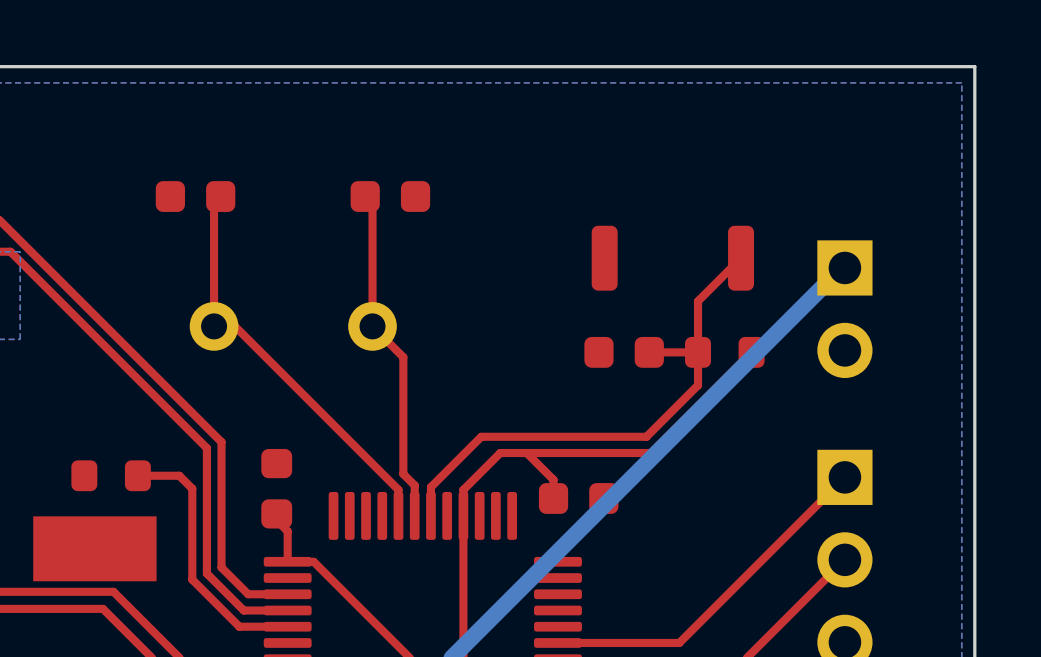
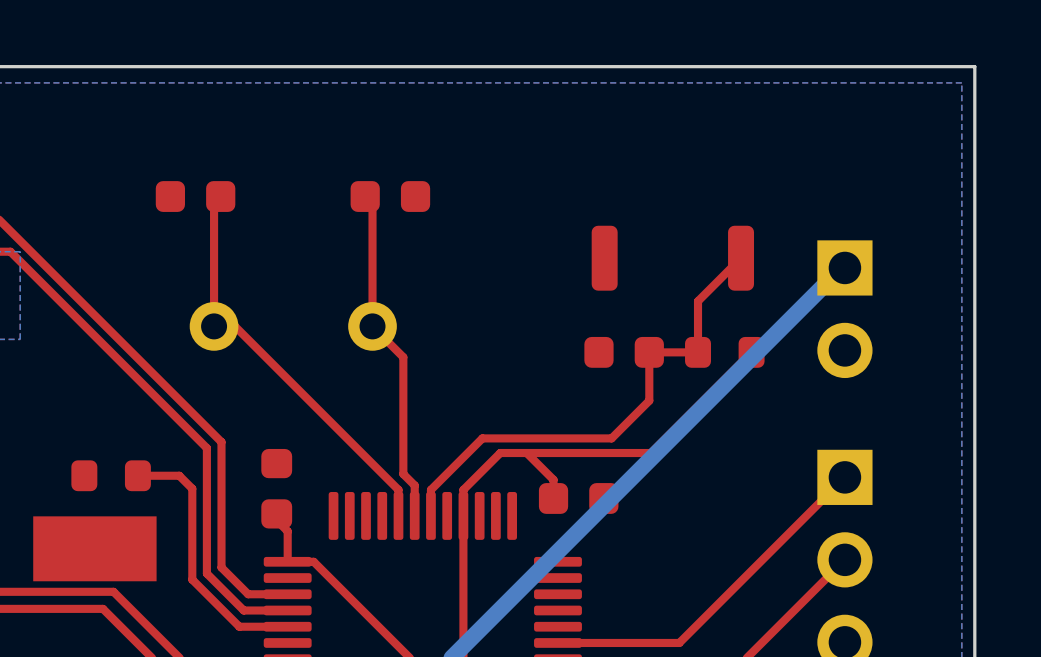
top track: (698, 352) (698, 385) (646, 436) (481, 436) (430, 487) (430, 489) -> (649, 352) (649, 400) (611, 438) (482, 438) (430, 489)

